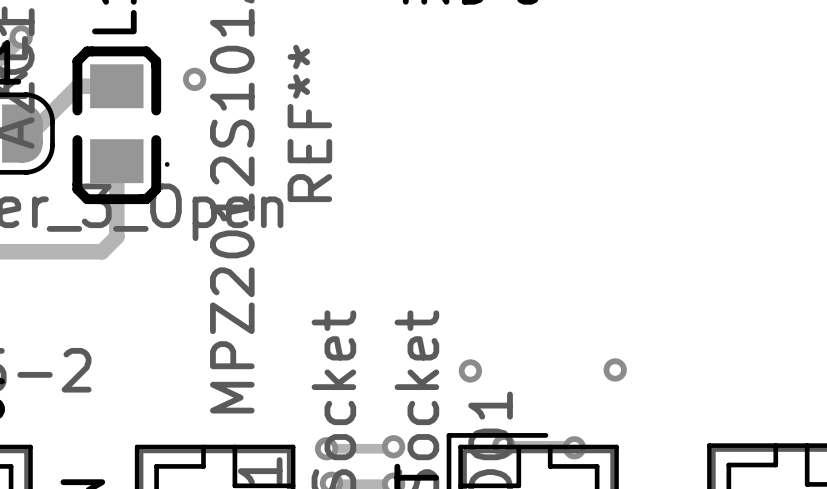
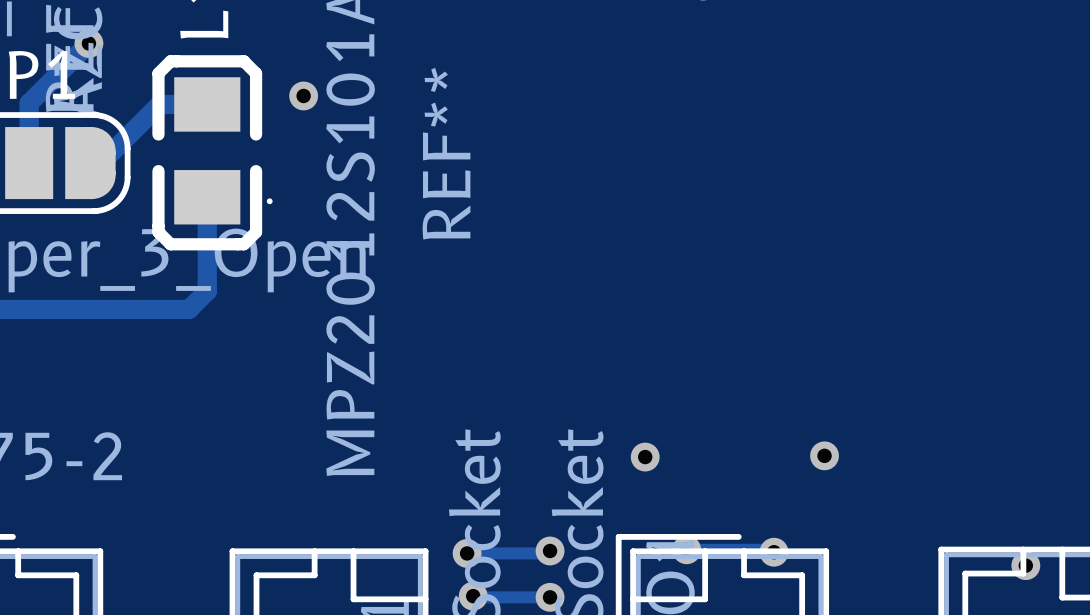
via: none -> (1025, 565)

